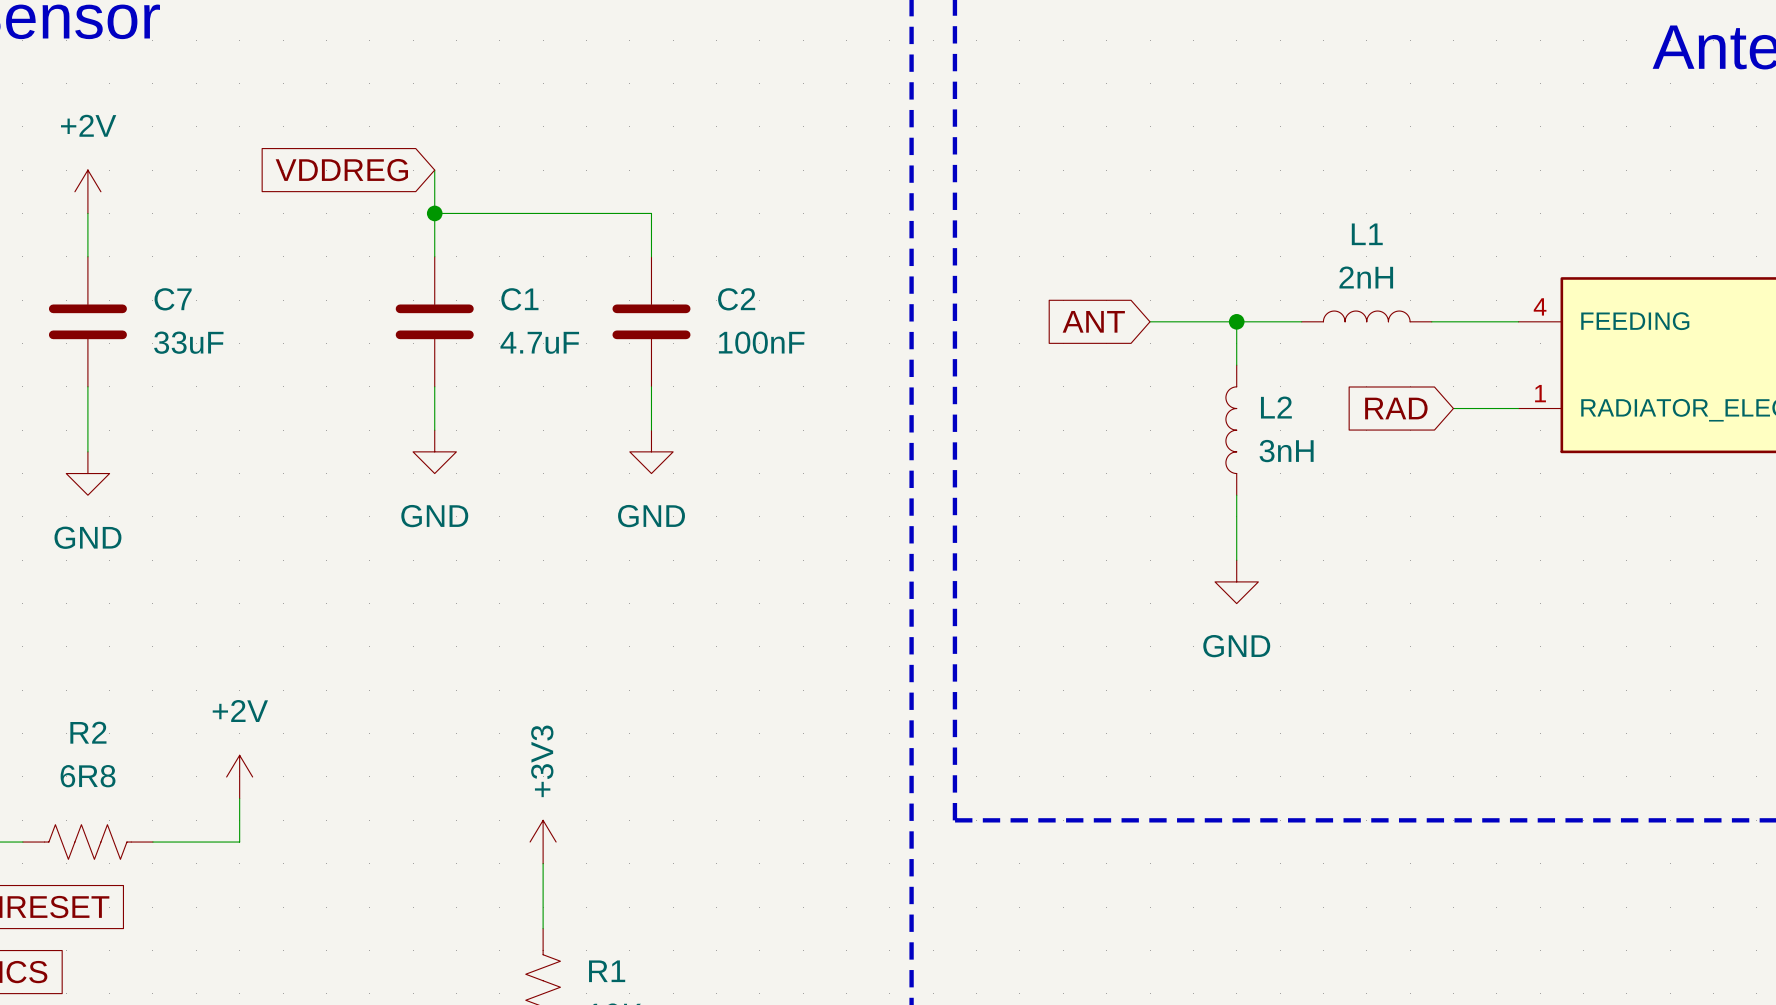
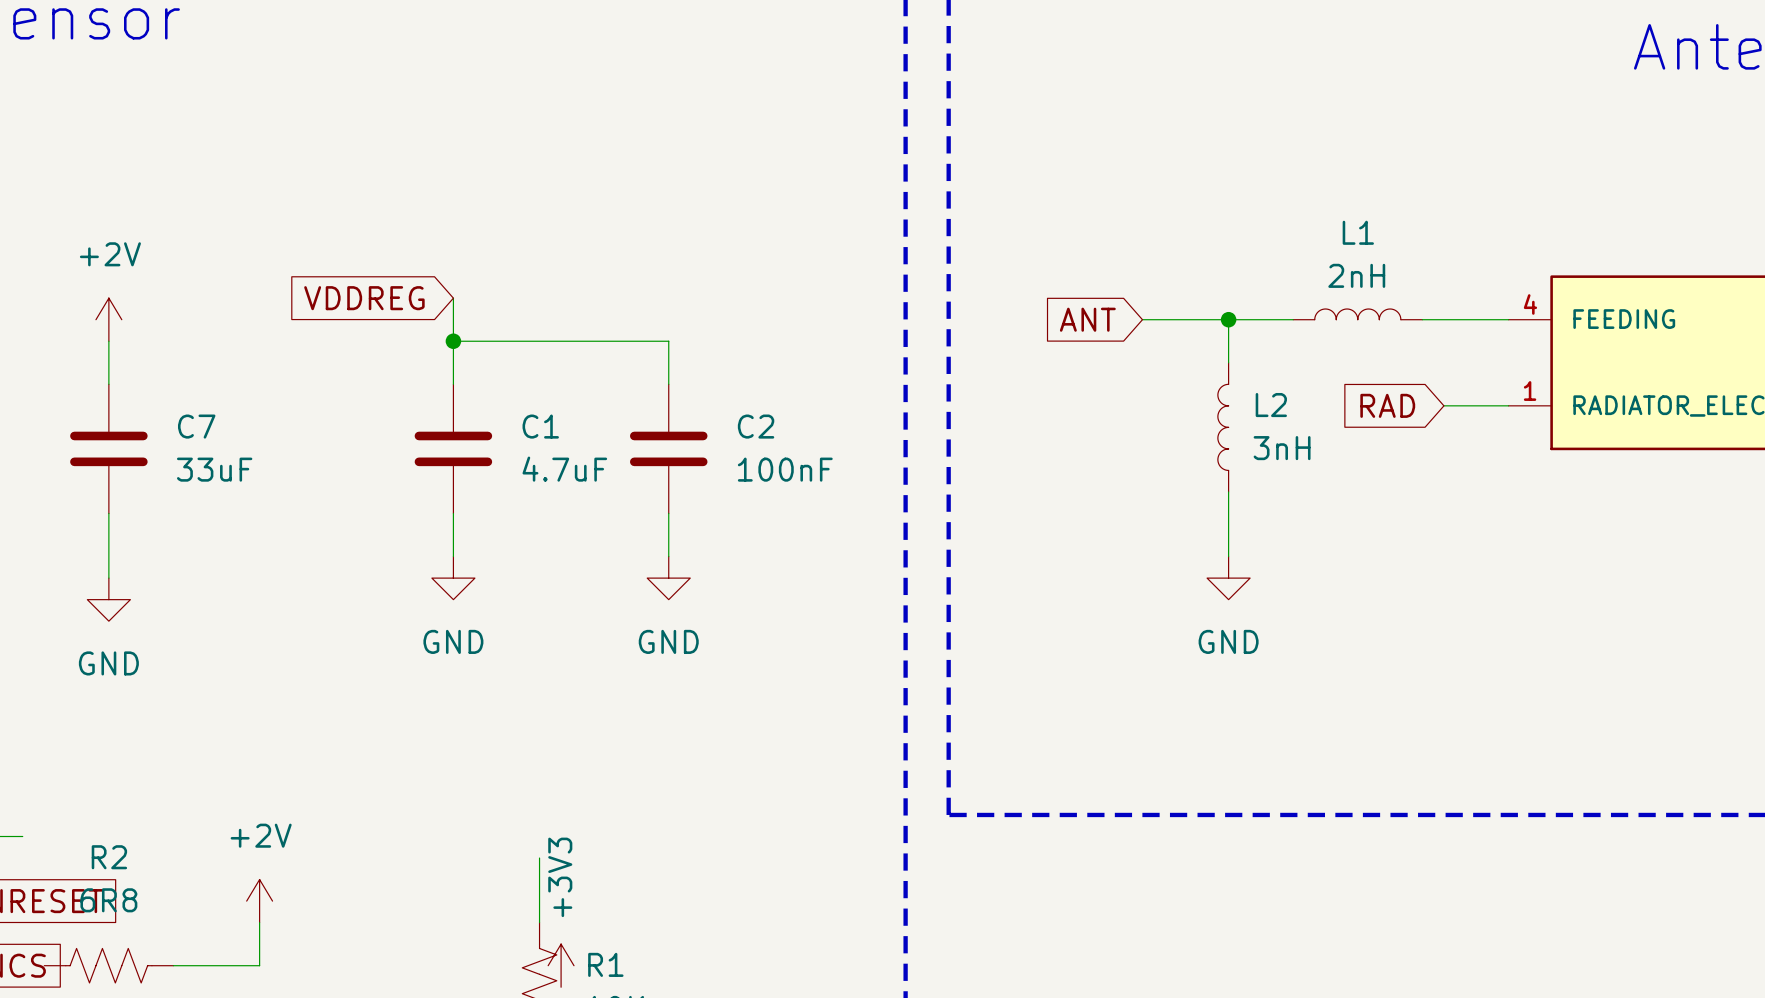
global label position: VDDREG (341, 170) -> VDDREG (364, 298)
wire: (434, 170) (434, 256) -> (453, 298) (453, 384)
power symbol position: +2V (87, 191) -> +2V (108, 319)
wire: (87, 213) (87, 256) -> (108, 341) (108, 384)
wire: (434, 213) (651, 213) (651, 256) -> (453, 341) (668, 341) (668, 384)
junction: (434, 213) -> none
C7 position: (87, 321) -> (108, 448)
C1 position: (434, 321) -> (453, 448)
C2 position: (651, 321) -> (668, 448)
junction: none -> (453, 341)
wire: (87, 386) (87, 451) -> (108, 513) (108, 578)
wire: (434, 386) (434, 430) -> (453, 513) (453, 556)
wire: (651, 386) (651, 430) -> (668, 513) (668, 556)
power symbol: GND (434, 451) -> none
power symbol: GND (651, 451) -> none
power symbol position: GND (87, 473) -> GND (108, 599)
power symbol: none -> GND (453, 578)
power symbol: none -> GND (668, 578)
power symbol position: +2V (239, 776) -> +2V (259, 901)
wire: (239, 798) (239, 842) (152, 842) -> (259, 922) (259, 965) (173, 965)
R2 position: (87, 842) -> (108, 965)
power symbol position: +3V3 (543, 842) -> +3V3 (561, 965)

